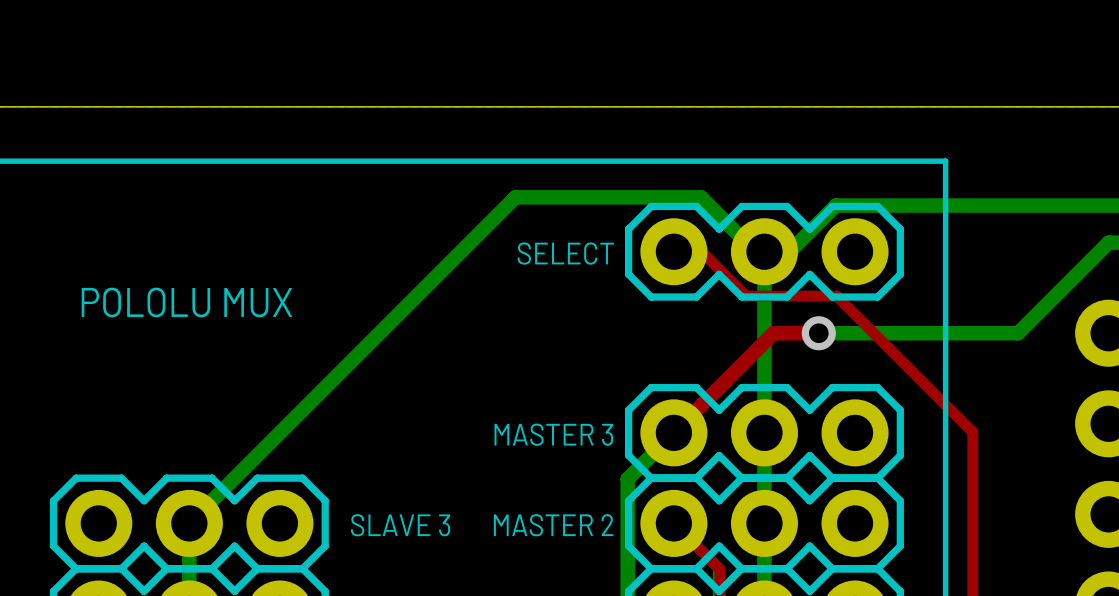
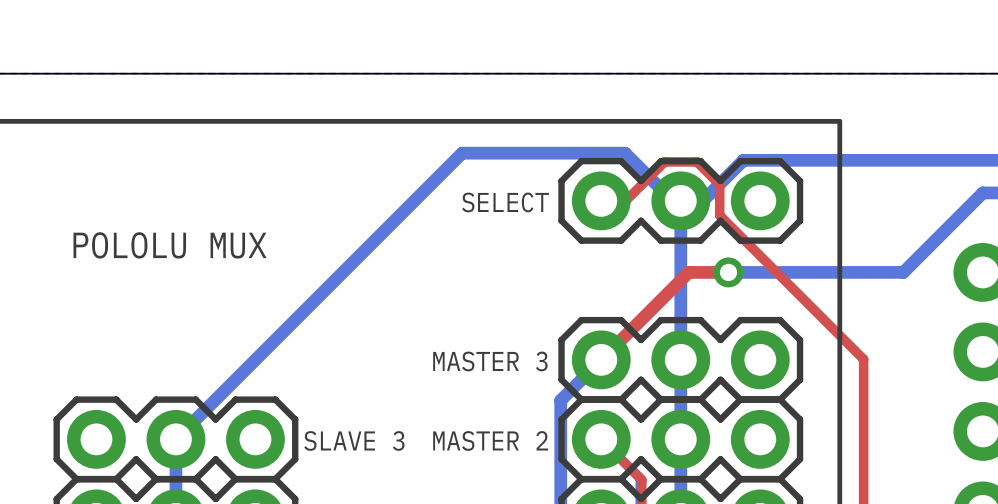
top track: (701, 251) (746, 296) (836, 296) -> (625, 200) (664, 161) (696, 161) (719, 184) (719, 215) (744, 239)

